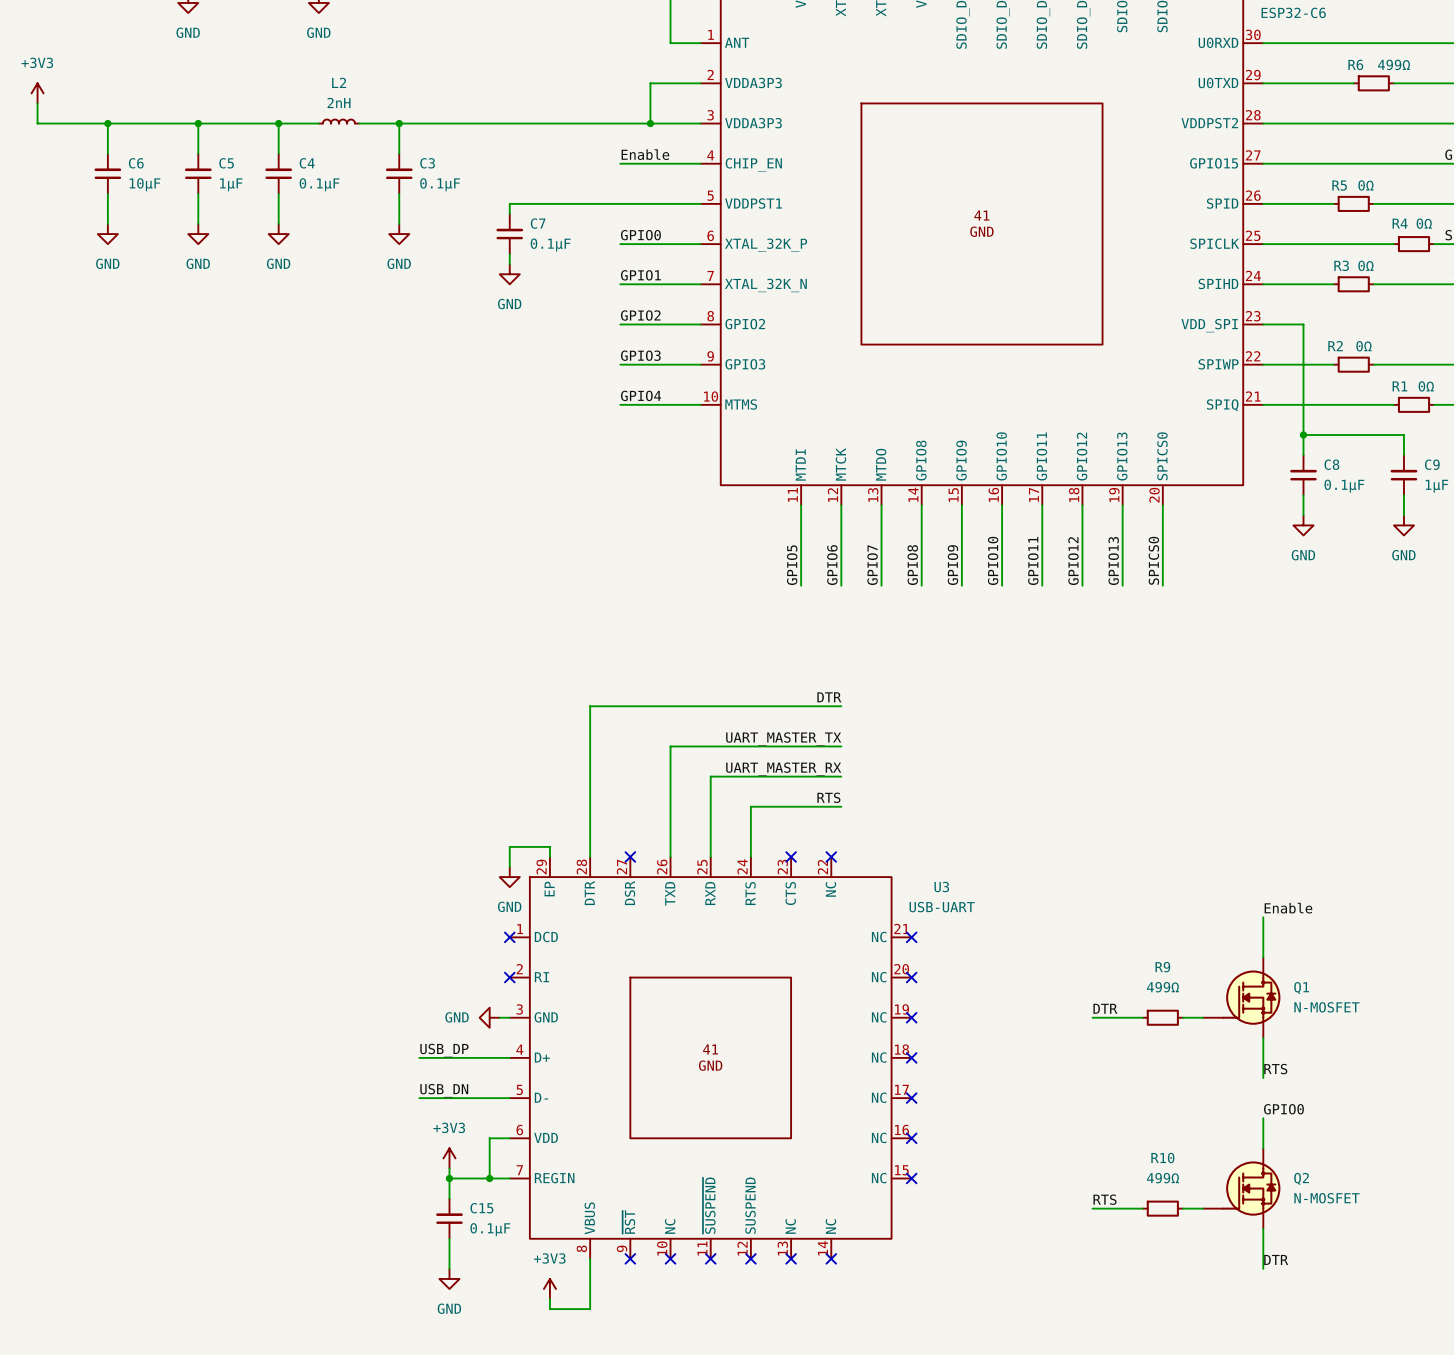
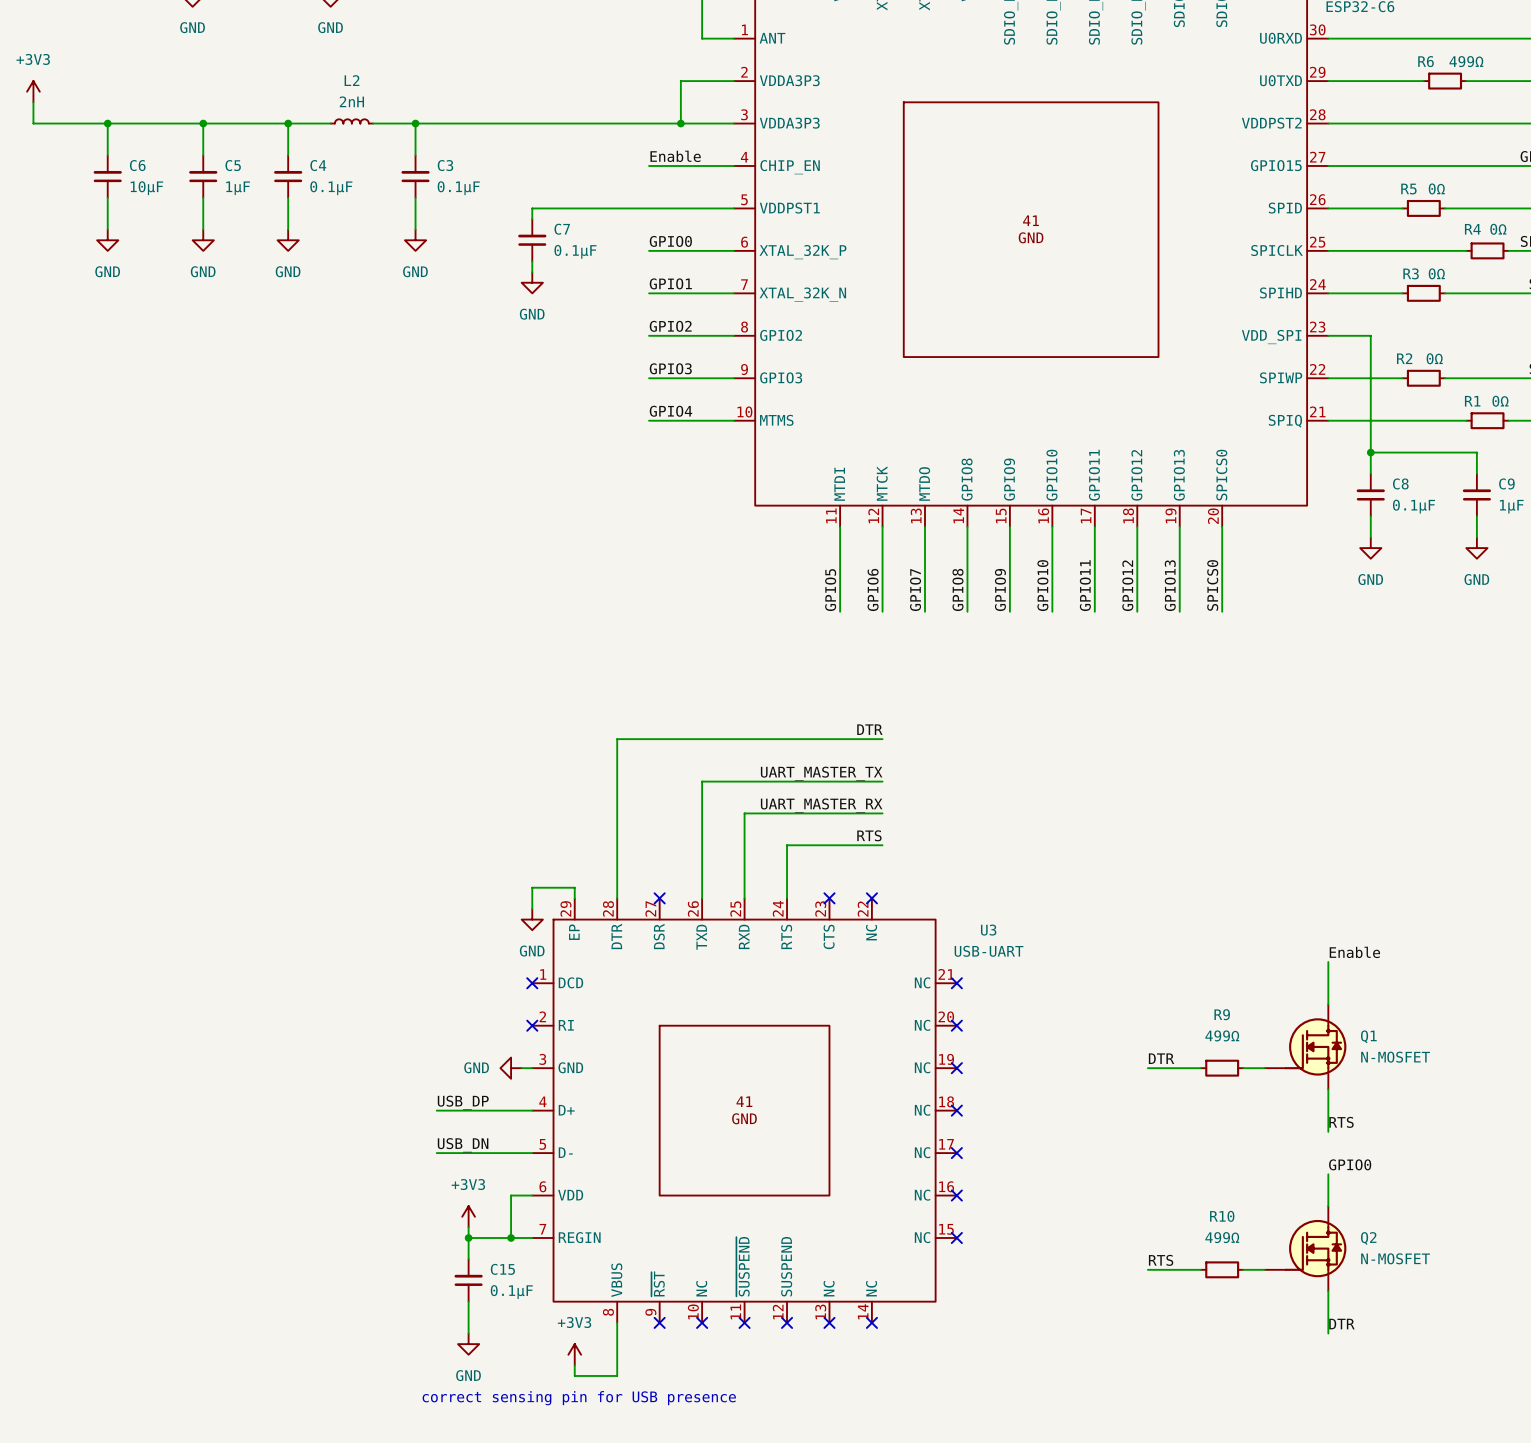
text: none -> correct sensing pin for USB presence (579, 1398)

